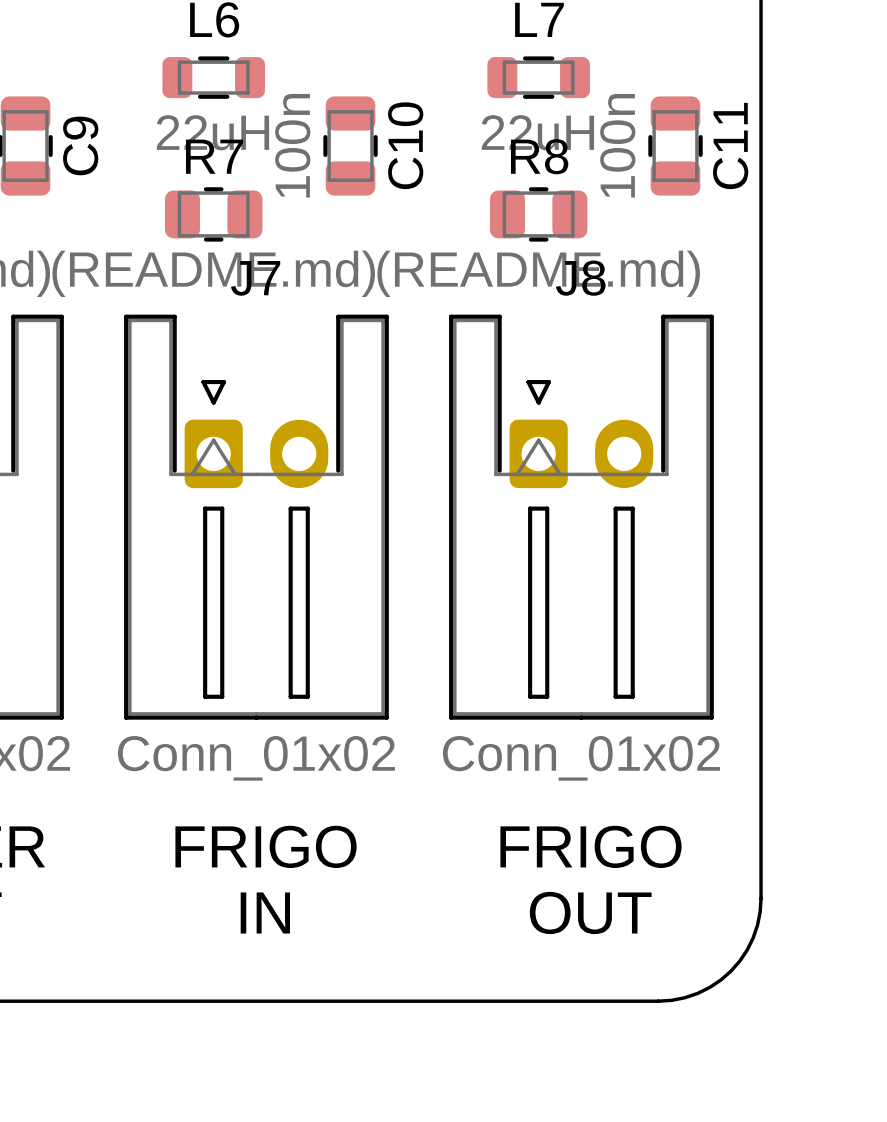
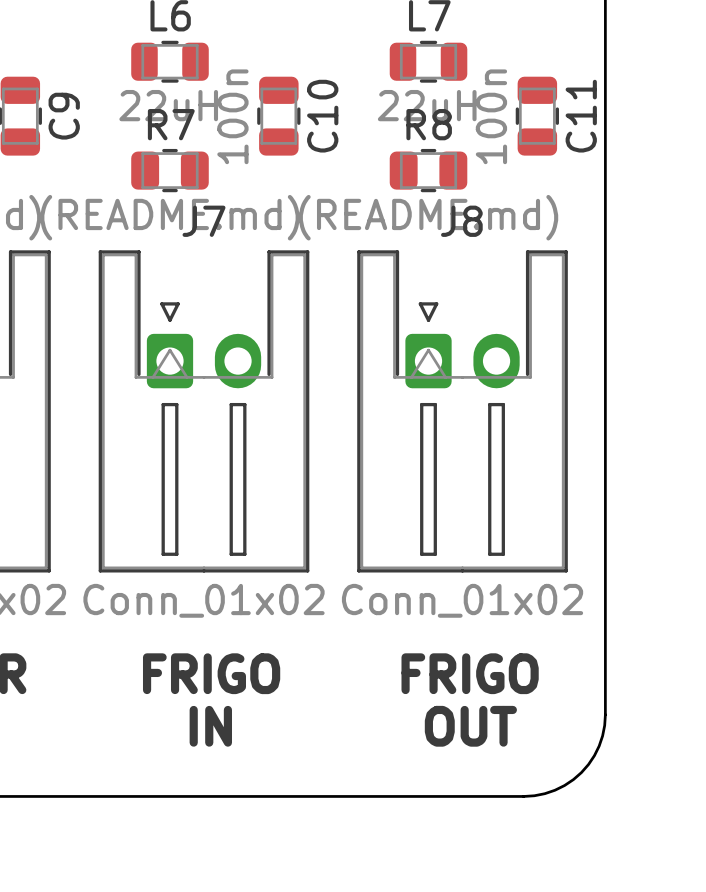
L6 footprint: [162, 56, 266, 99] -> [131, 40, 209, 83]
L7 footprint: [487, 56, 590, 99] -> [389, 40, 468, 83]

